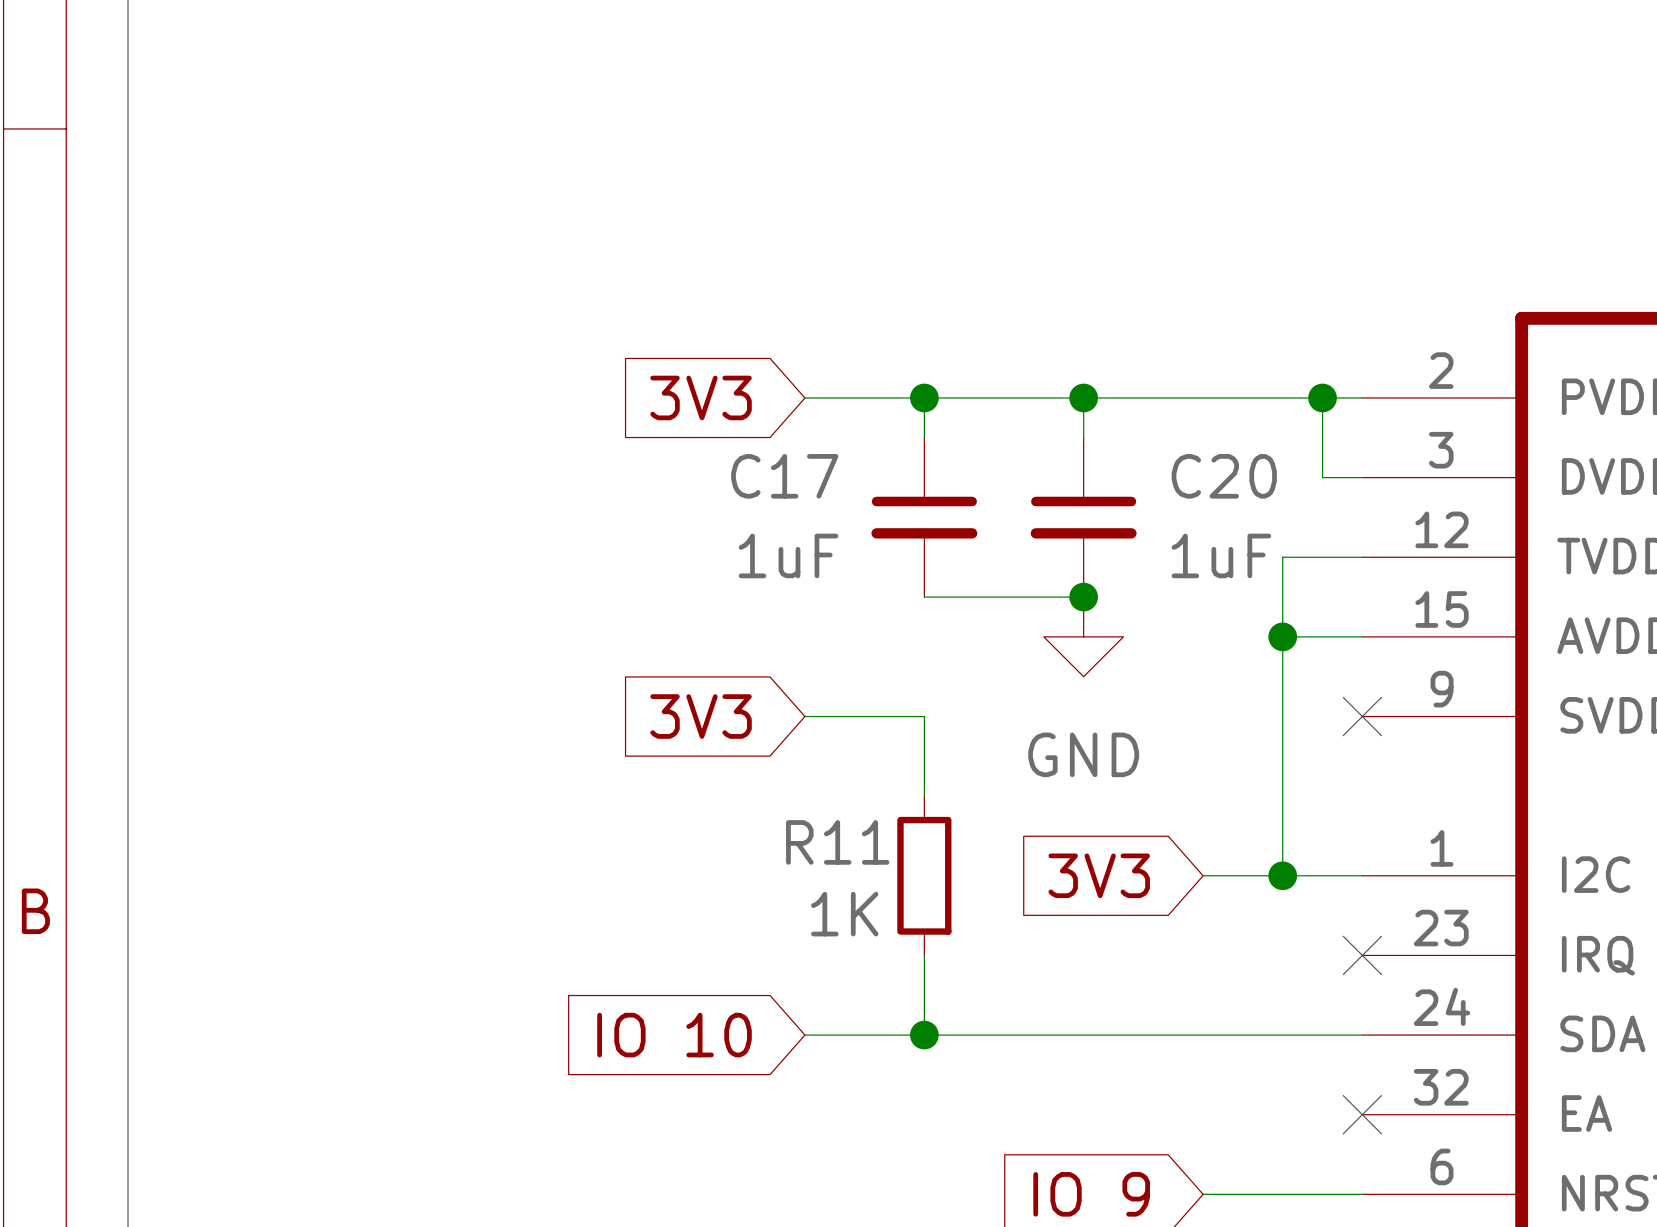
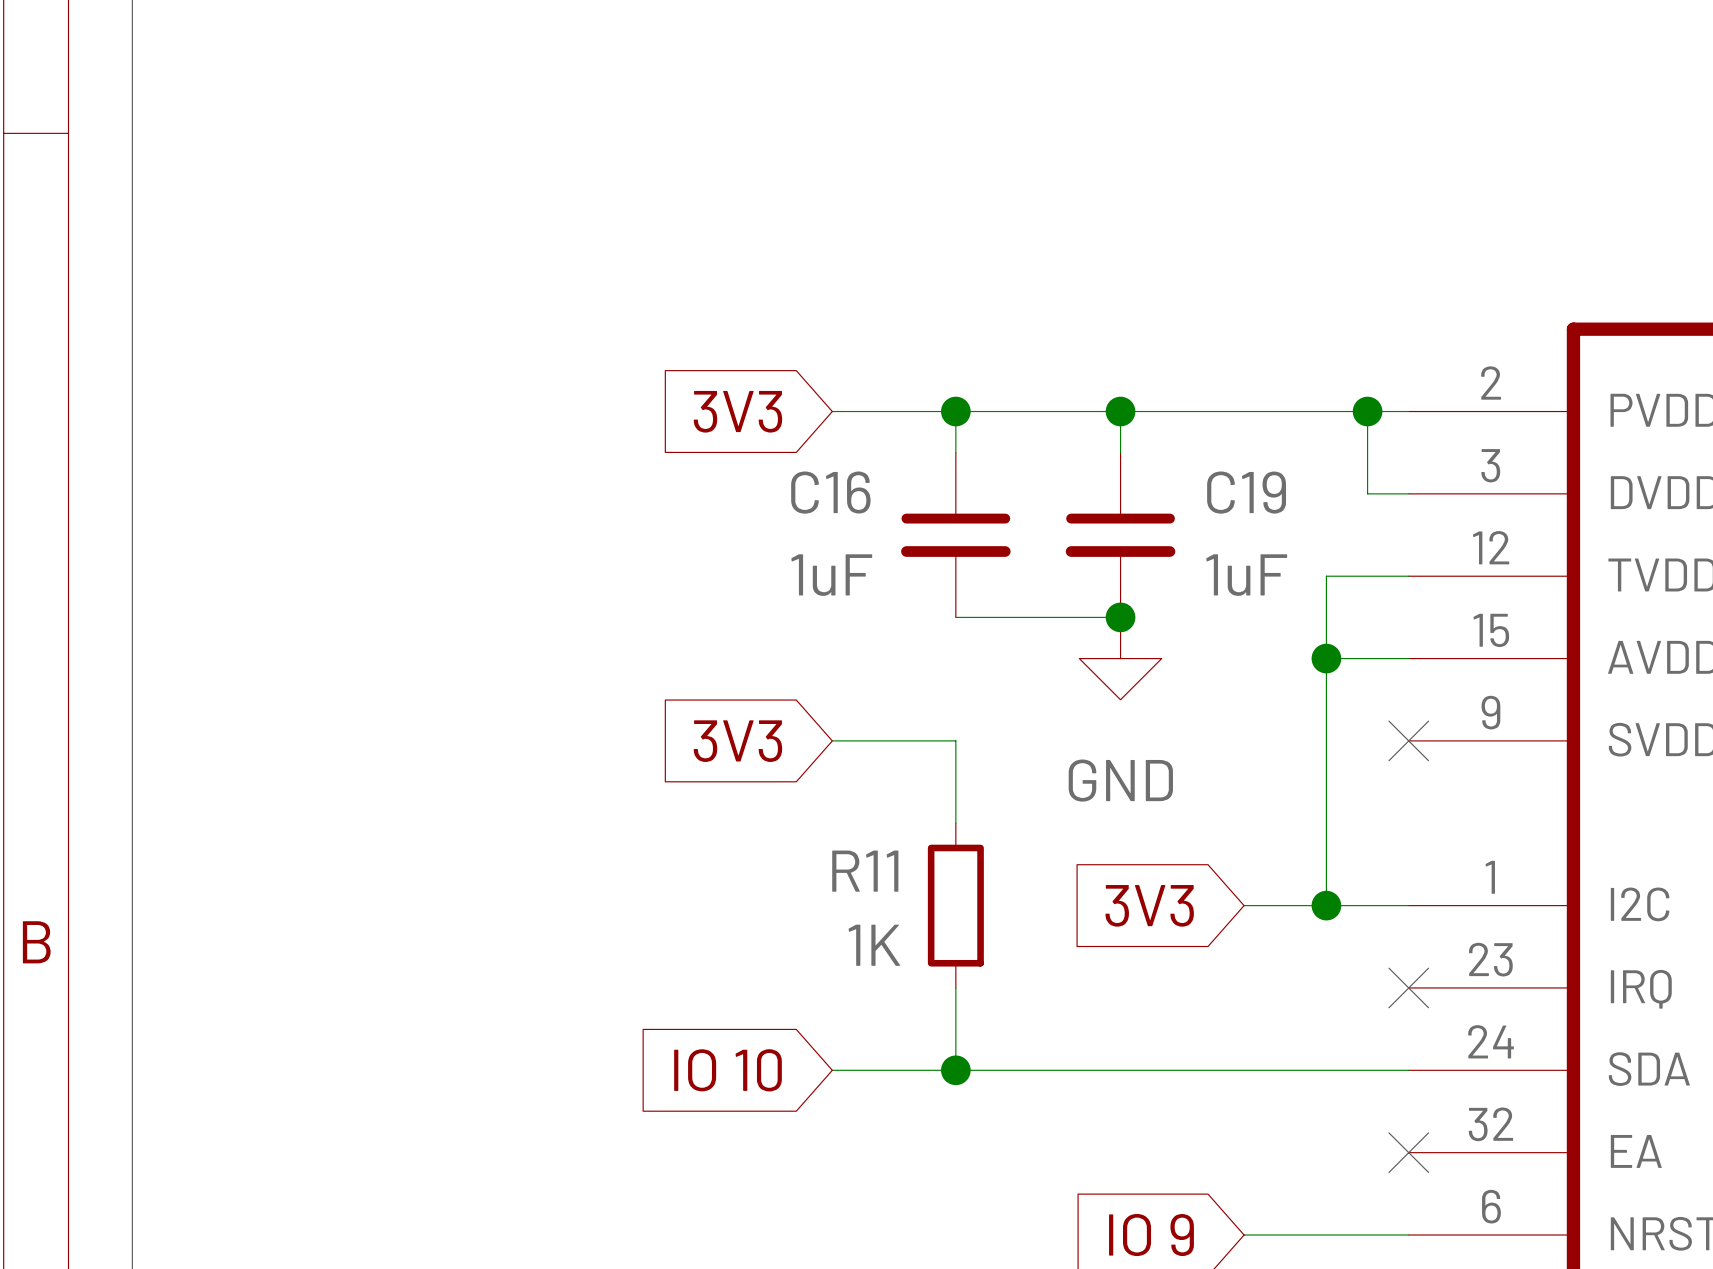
C17 name: C17 (784, 476) -> C16 (830, 492)
C20 name: C20 (1224, 476) -> C19 (1246, 492)

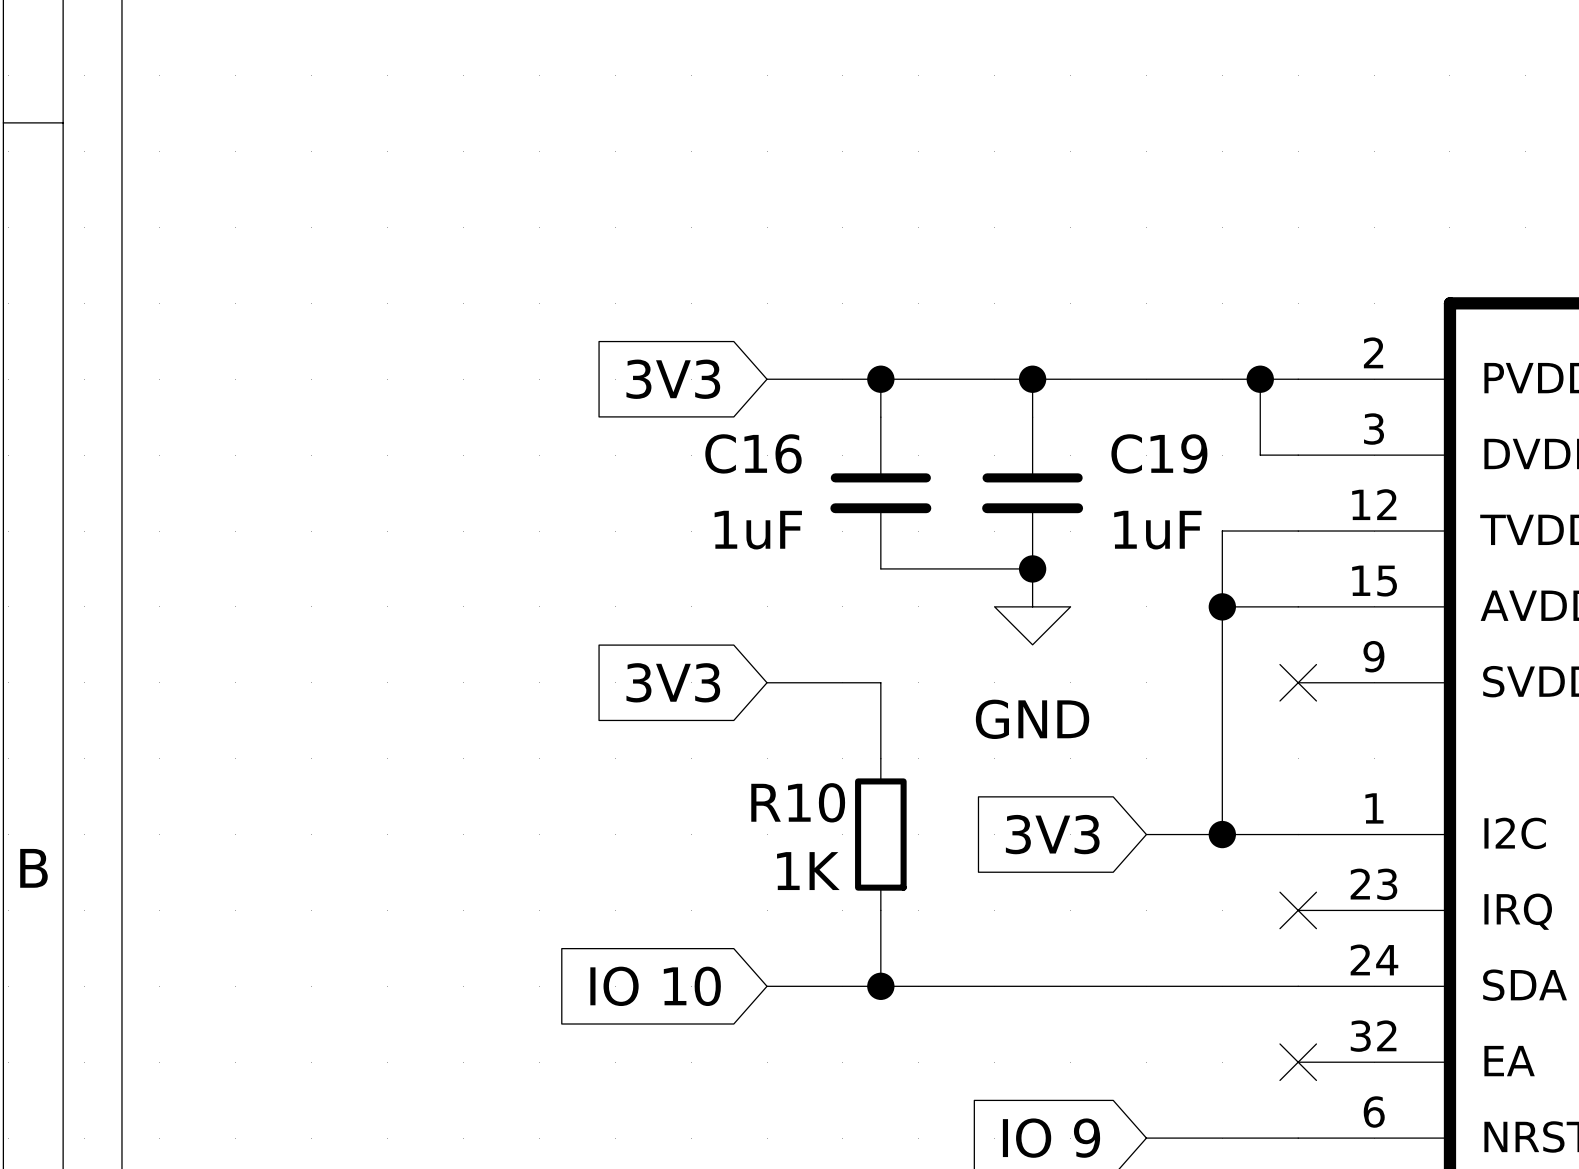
R11 name: R11 (865, 871) -> R10 (798, 802)

